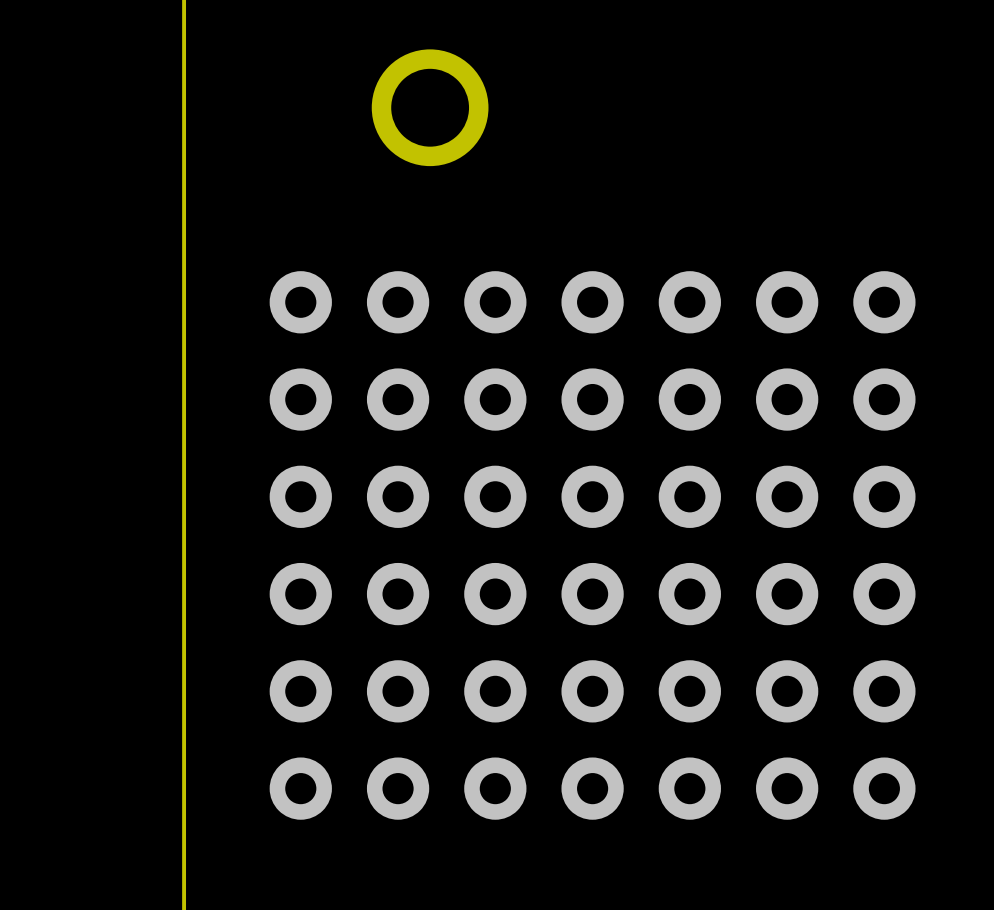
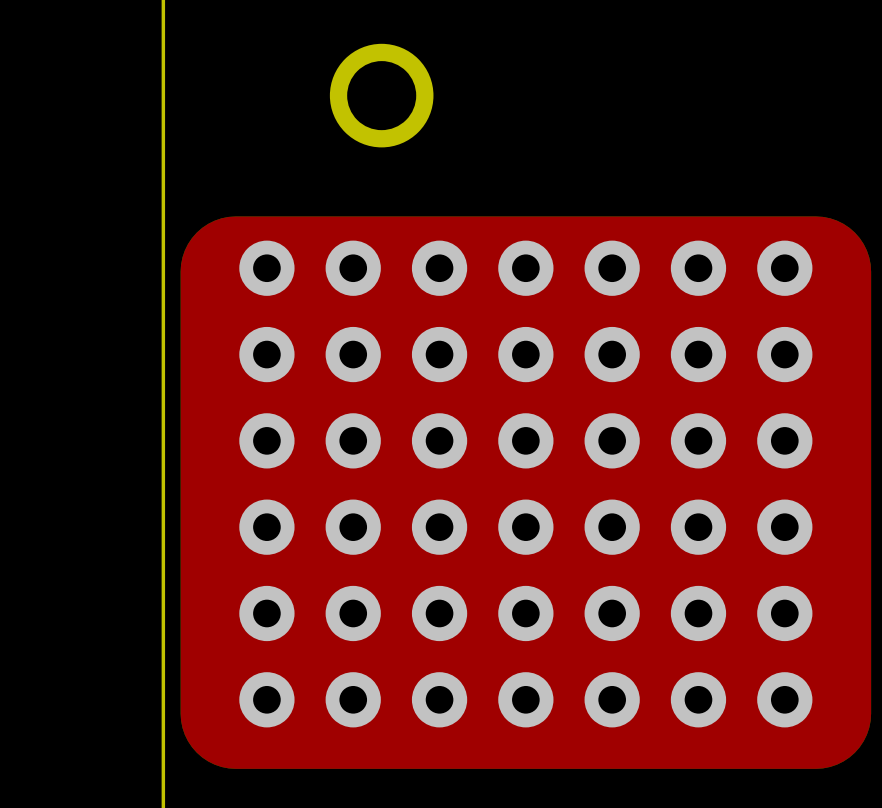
part: none -> (525, 492)

